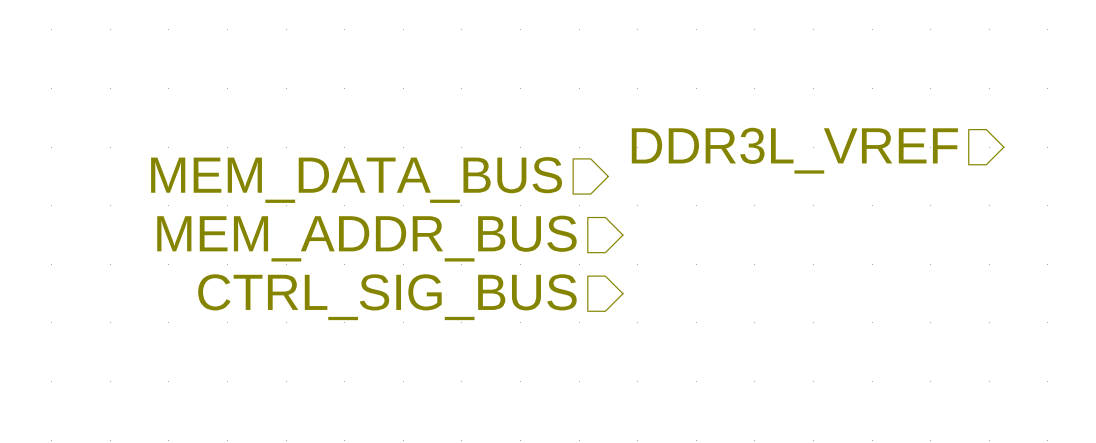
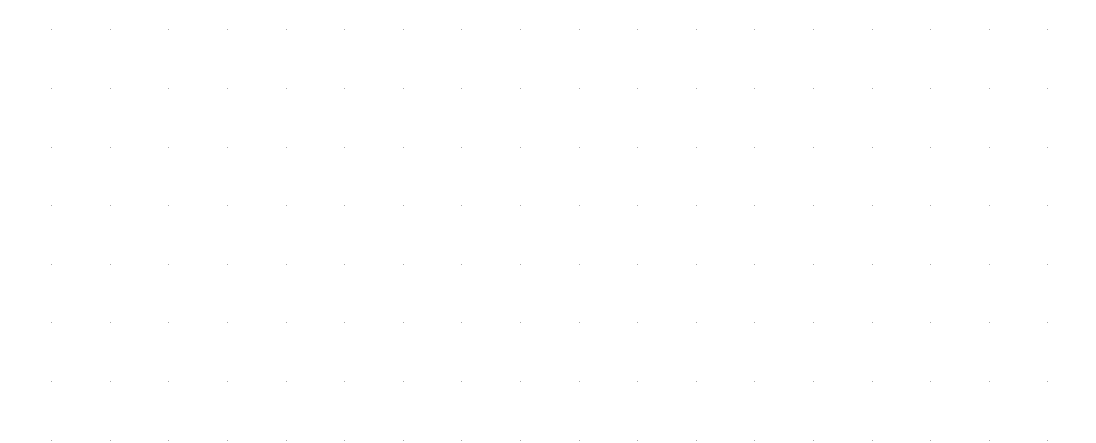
hierarchical label: DDR3L_VREF (794, 150) -> none
hierarchical label: MEM_DATA_BUS (356, 179) -> none
hierarchical label: MEM_ADDR_BUS (366, 238) -> none
hierarchical label: CTRL_SIG_BUS (387, 297) -> none

